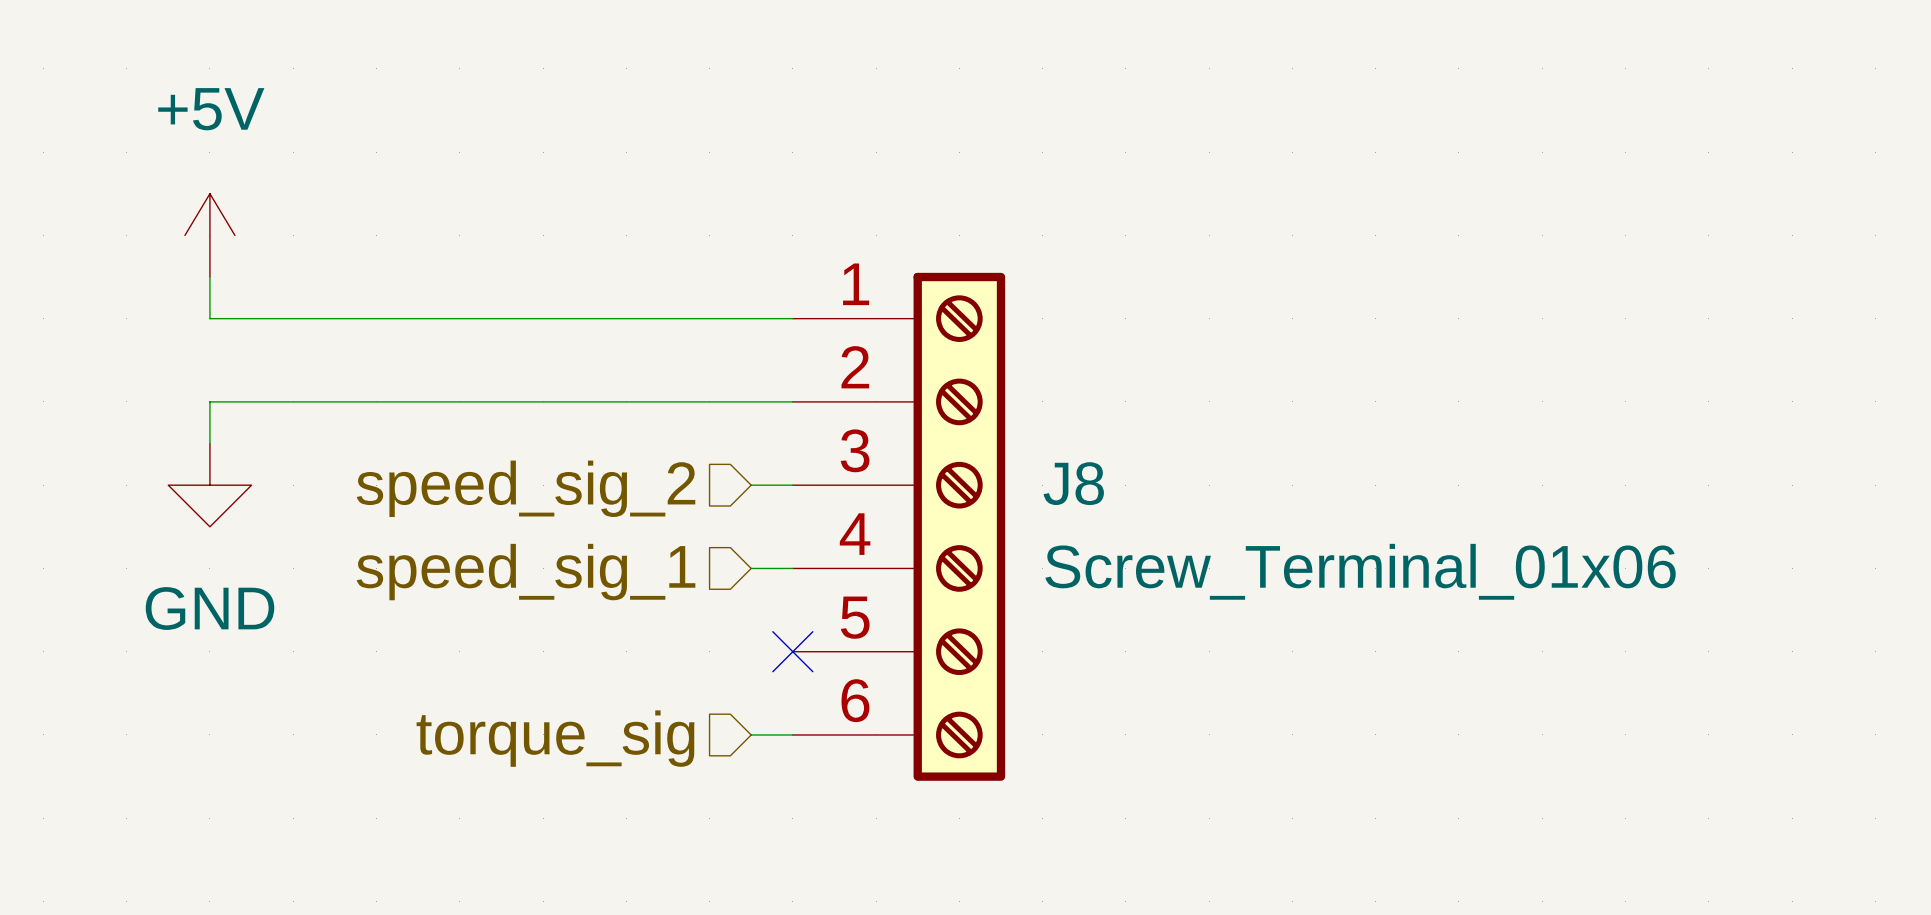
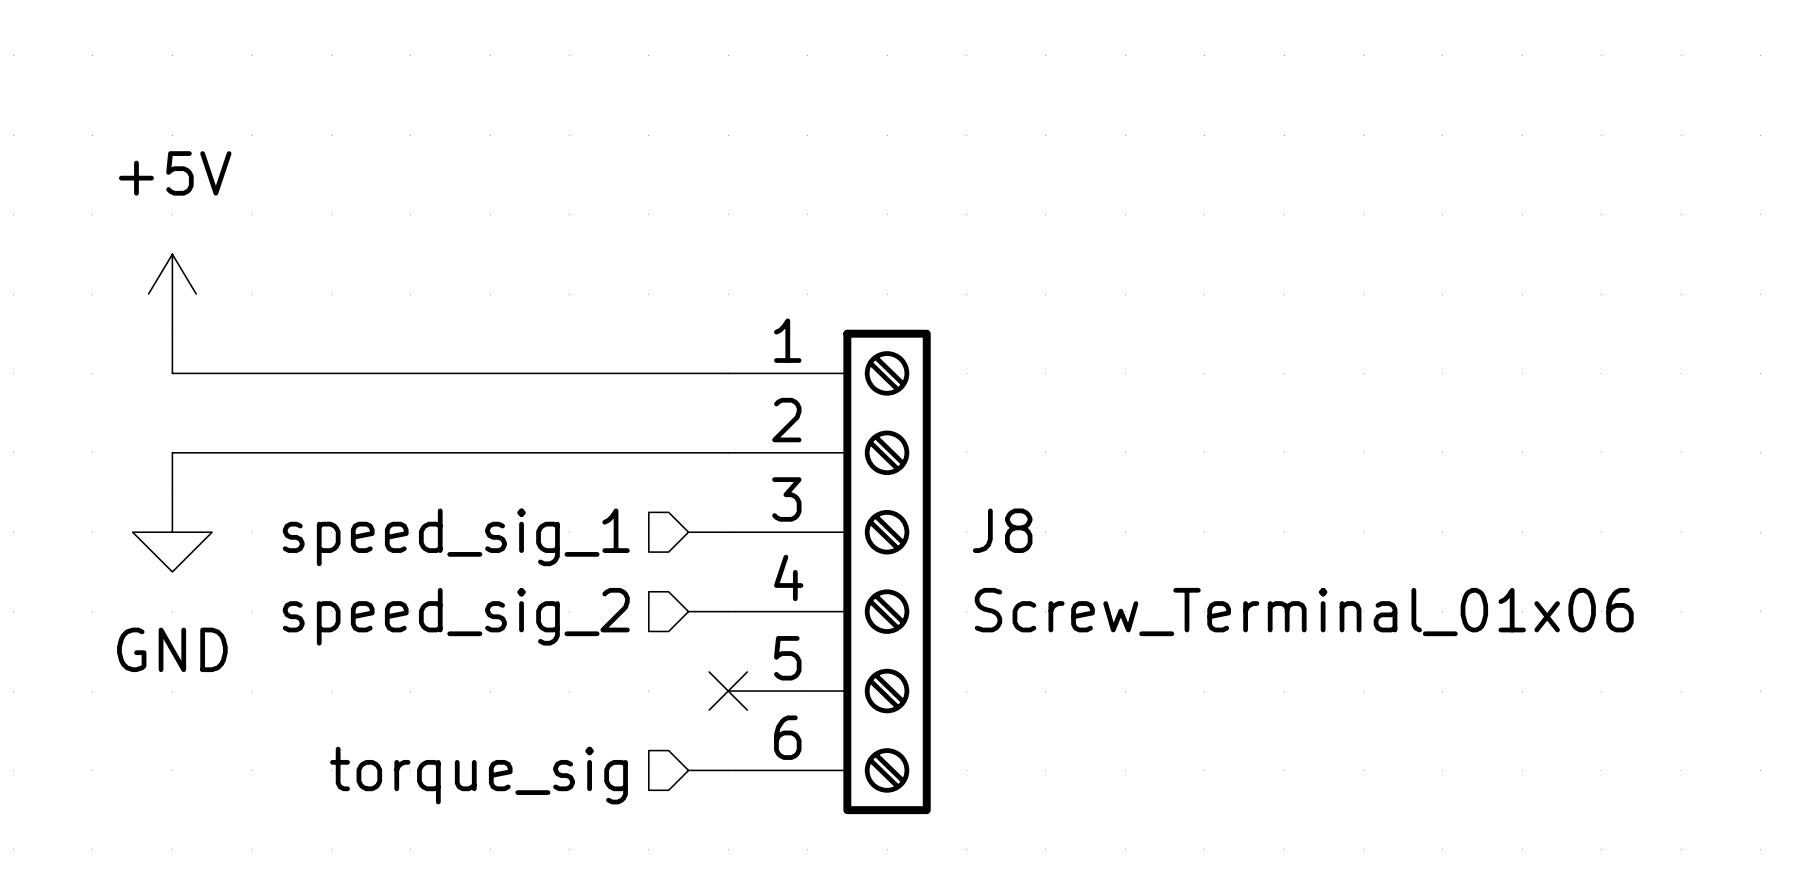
hierarchical label: speed_sig_2 (526, 488) -> speed_sig_1 (456, 537)
hierarchical label: speed_sig_1 (526, 572) -> speed_sig_2 (456, 616)

